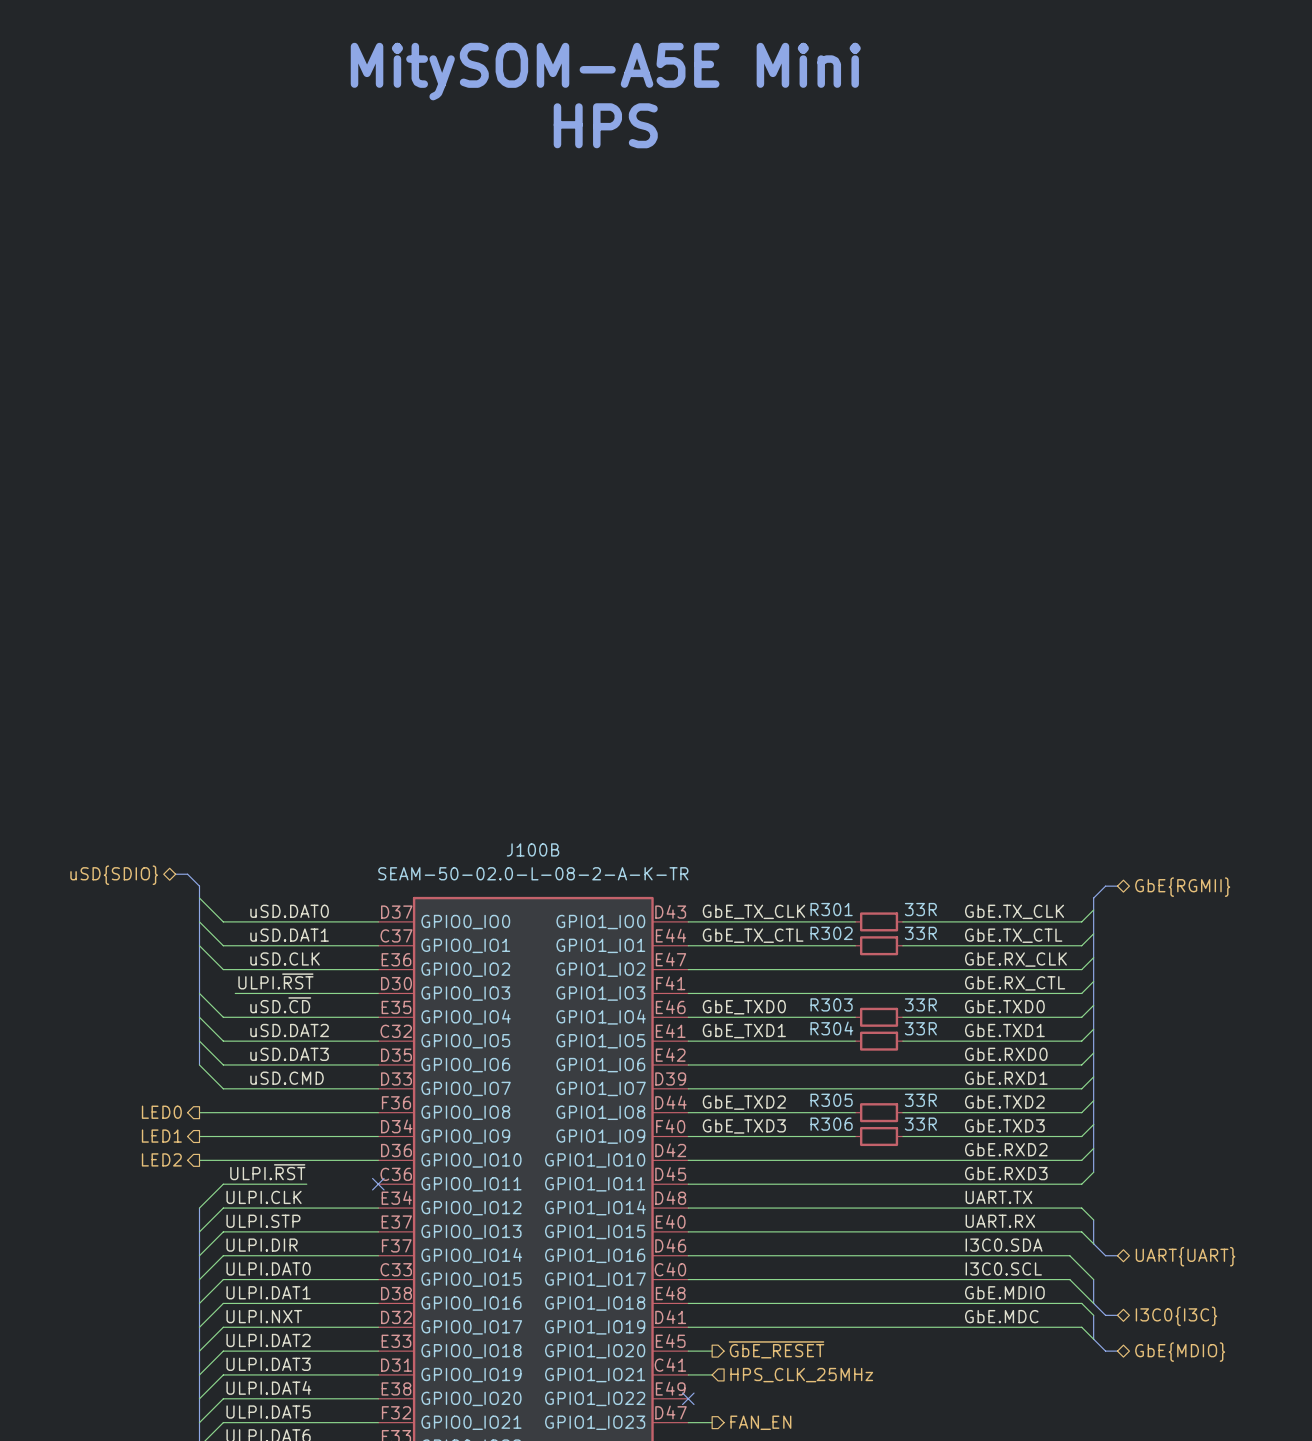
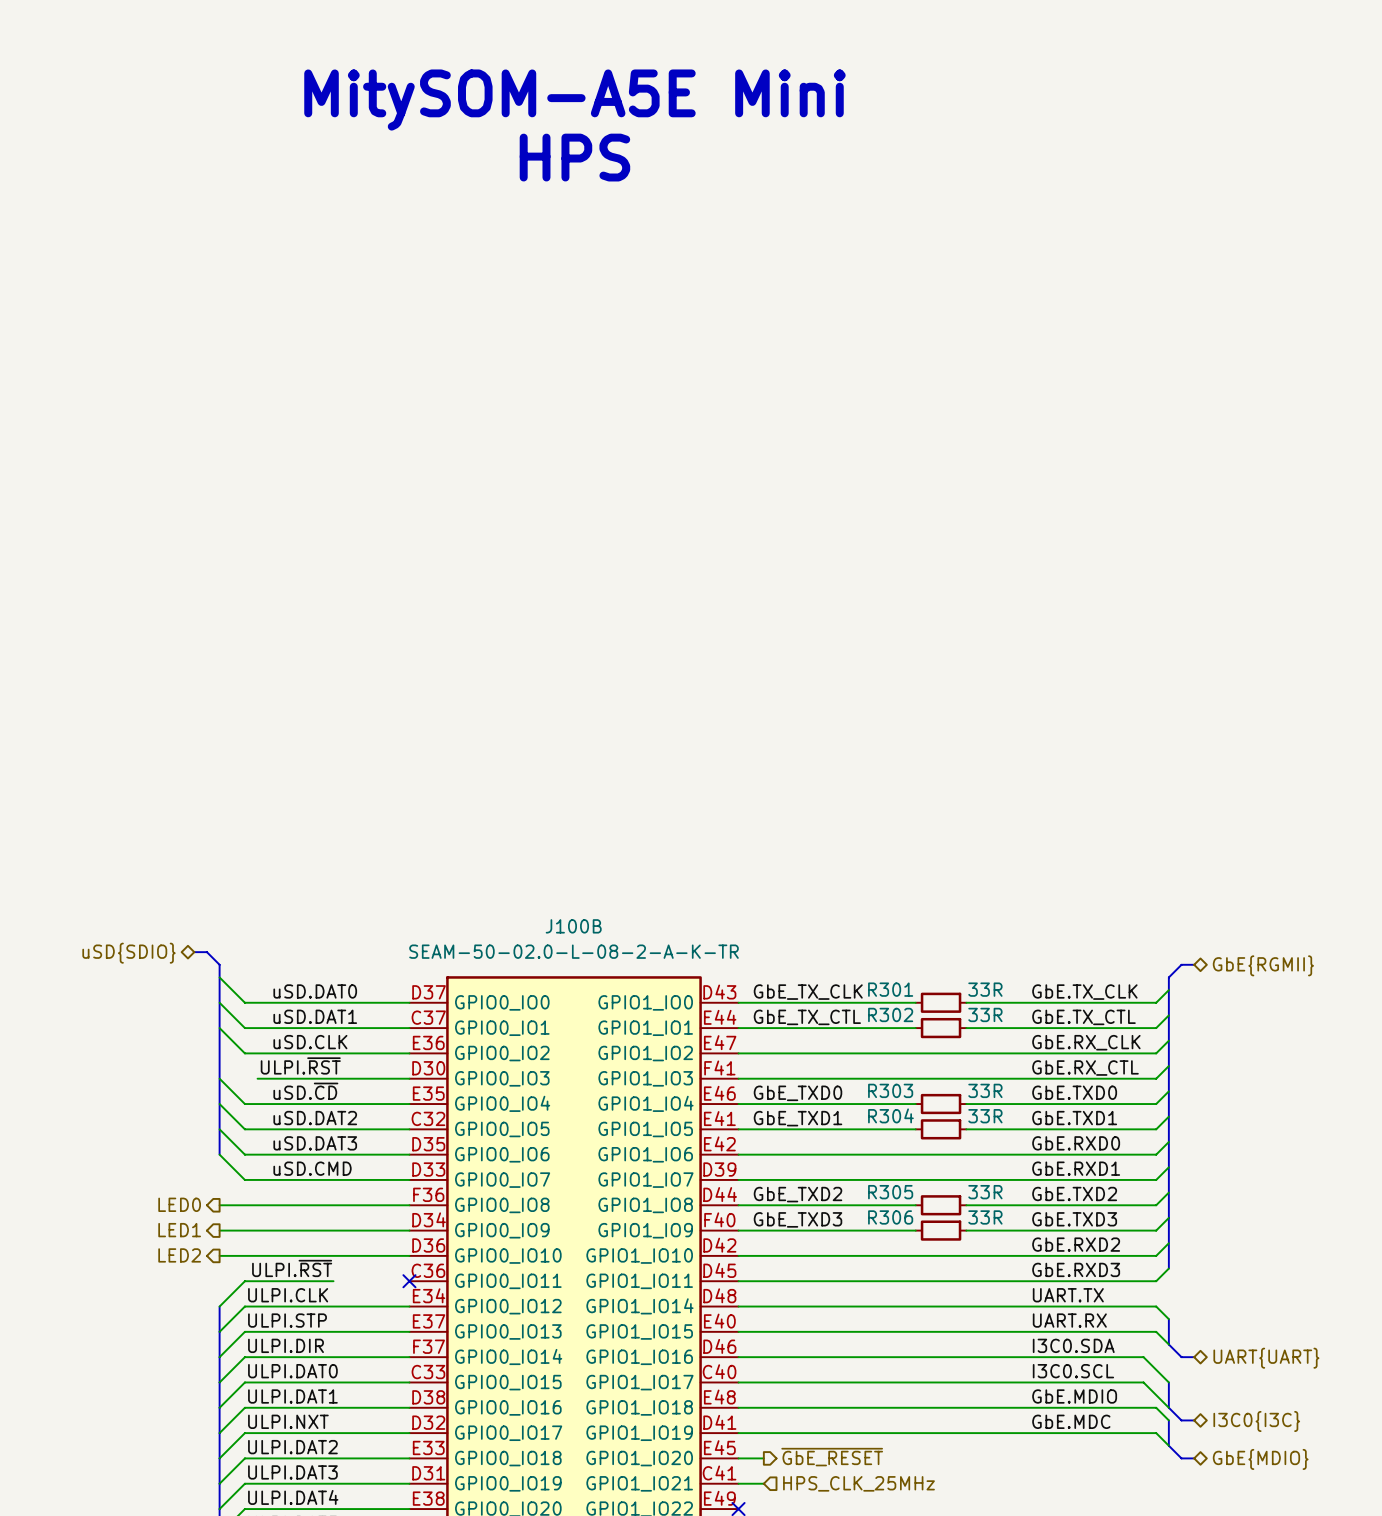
text position: MitySOM-A5E Mini (605, 71) -> MitySOM-A5E Mini (574, 100)
text position: HPS (605, 125) -> HPS (574, 157)

